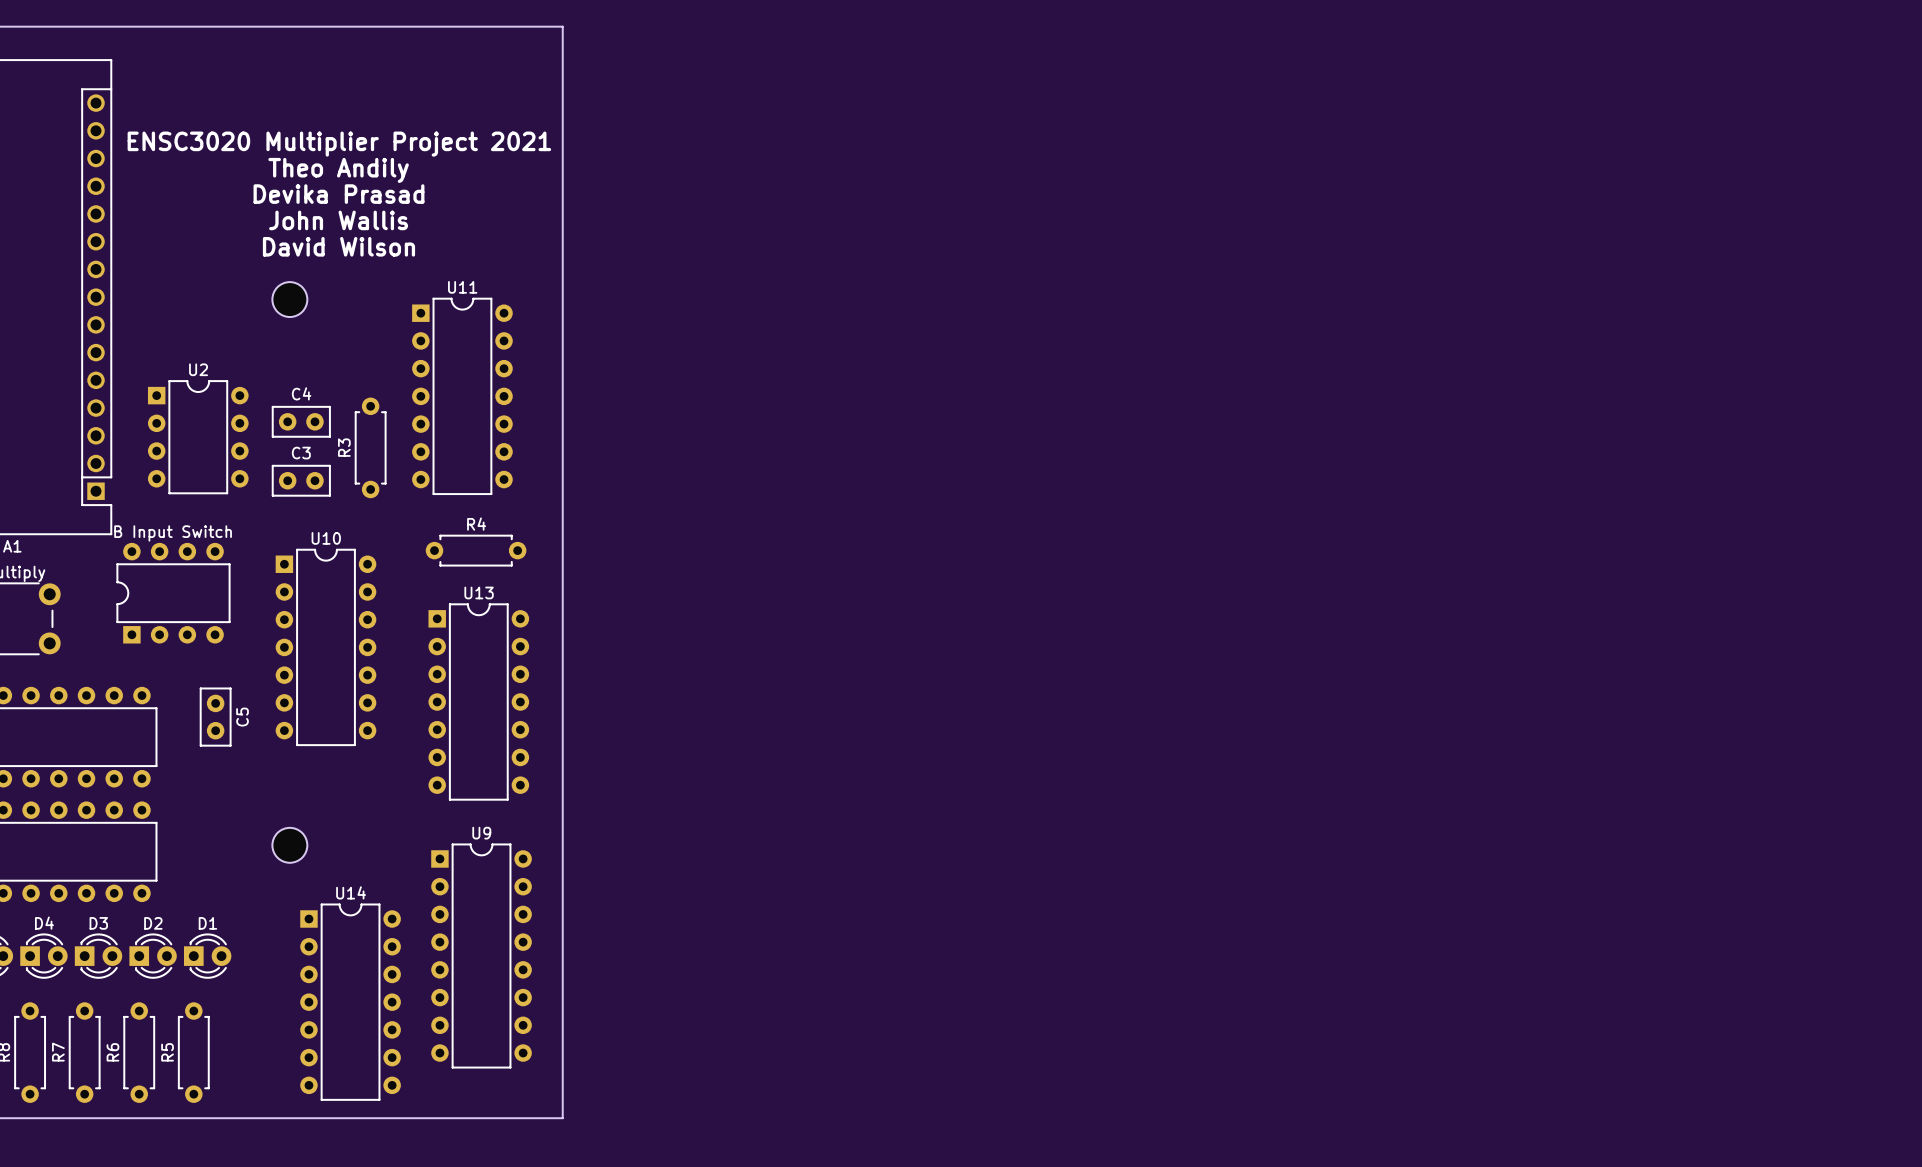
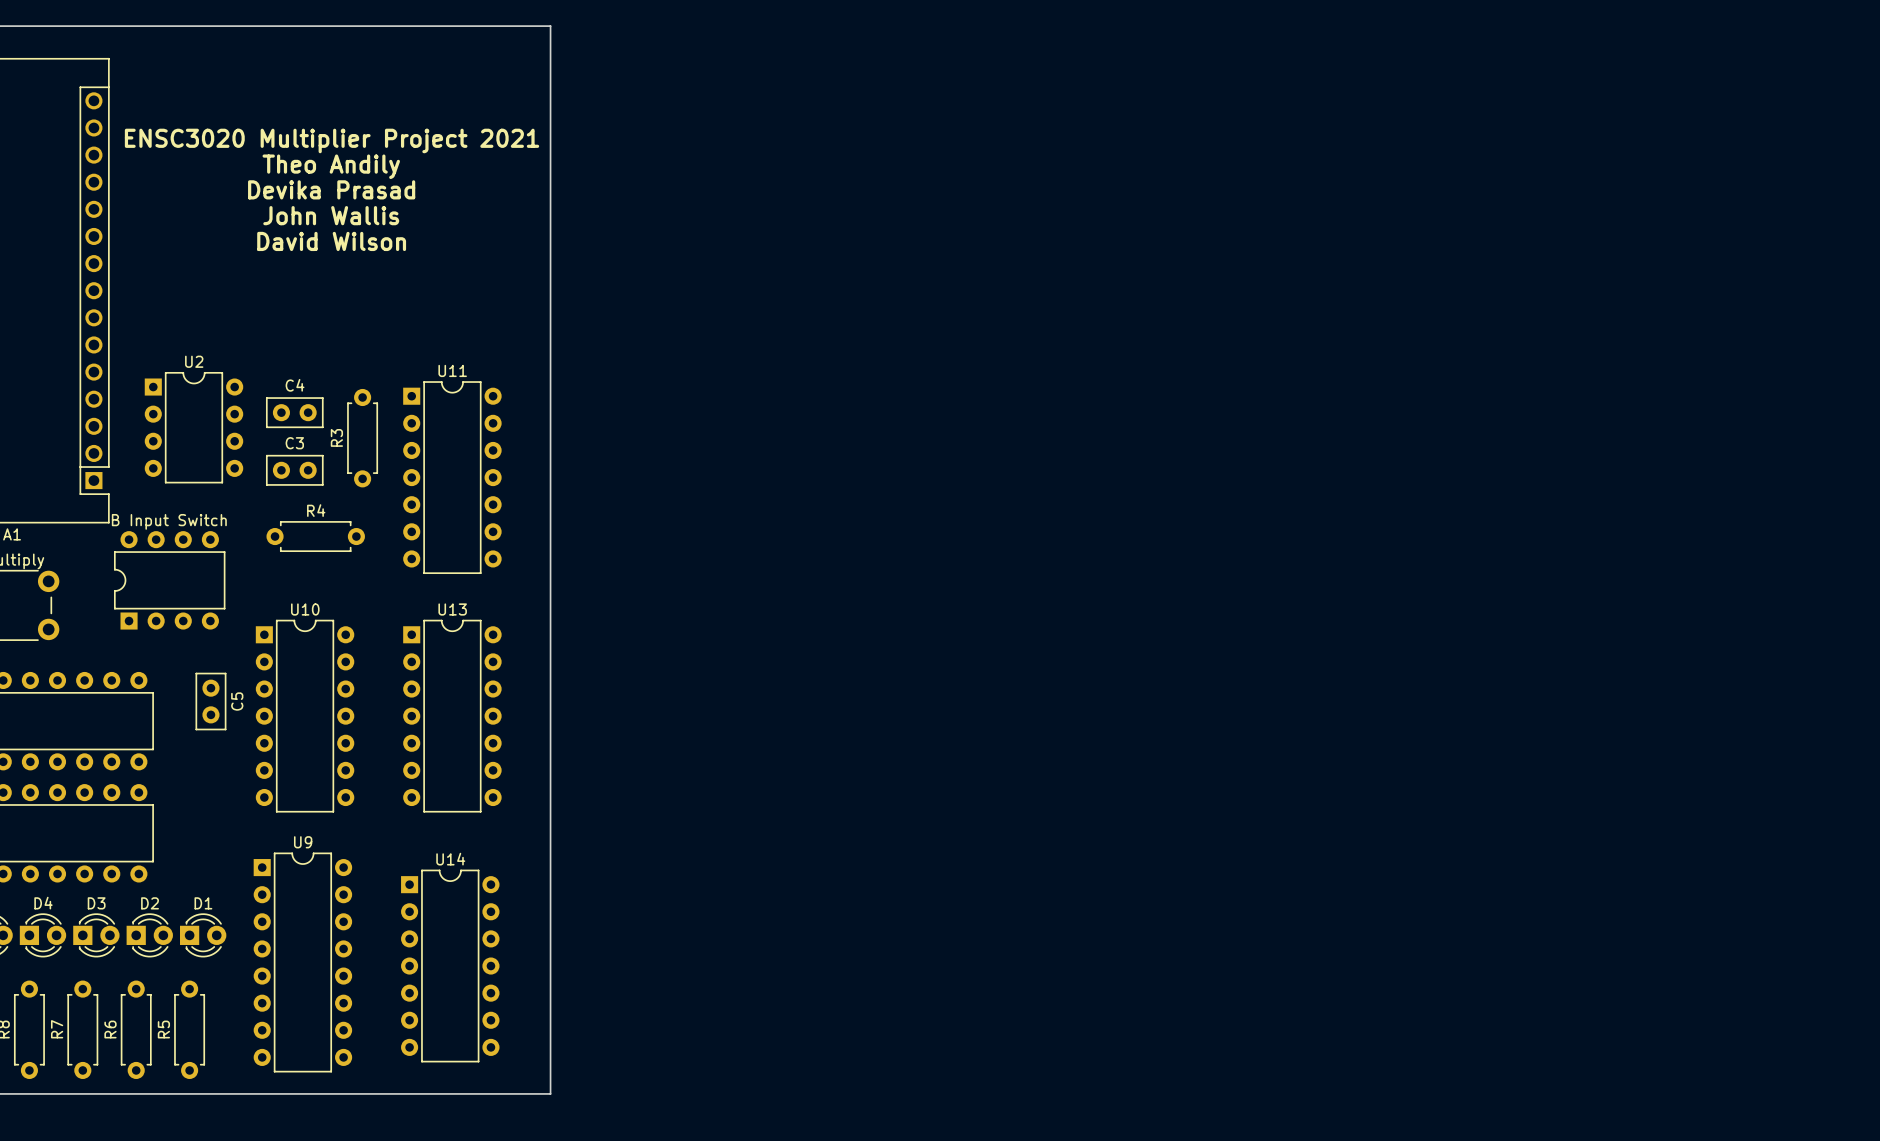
part: (289, 299) -> none
U11 position: (462, 396) -> (452, 477)
R4 position: (476, 550) -> (315, 536)
U10 position: (325, 647) -> (305, 716)
U13 position: (478, 702) -> (452, 716)
part: (289, 845) -> none
U9 position: (481, 956) -> (302, 962)
U14 position: (350, 1002) -> (450, 966)

